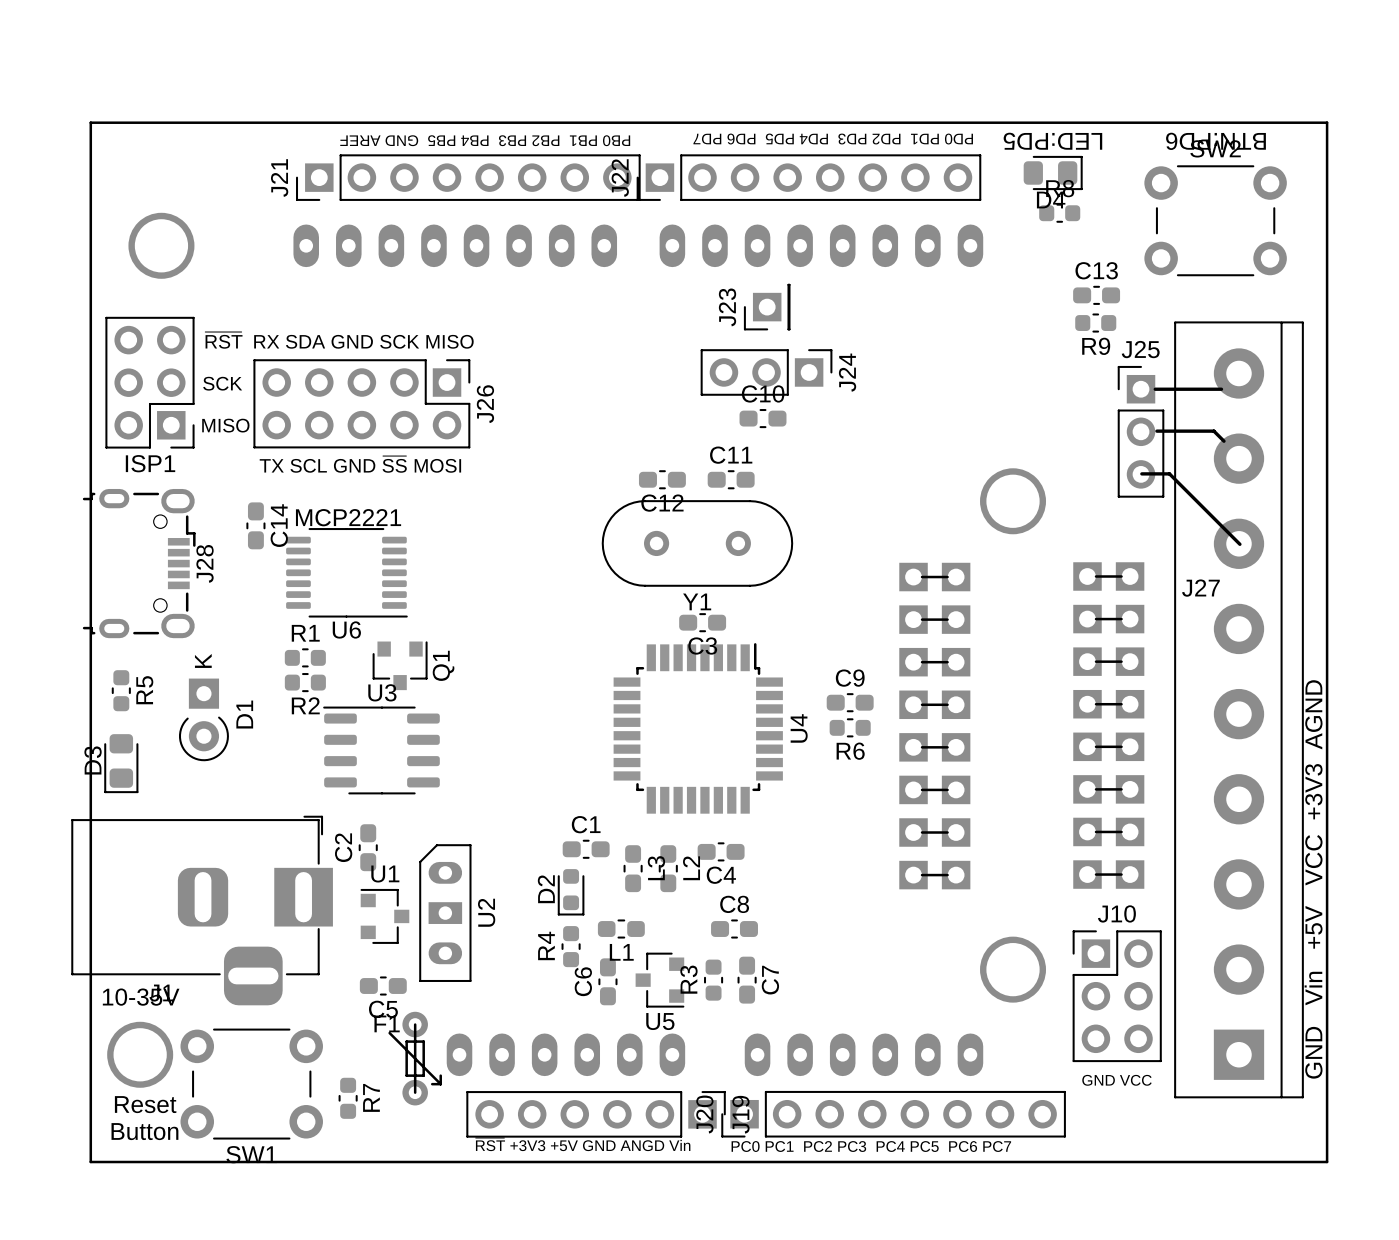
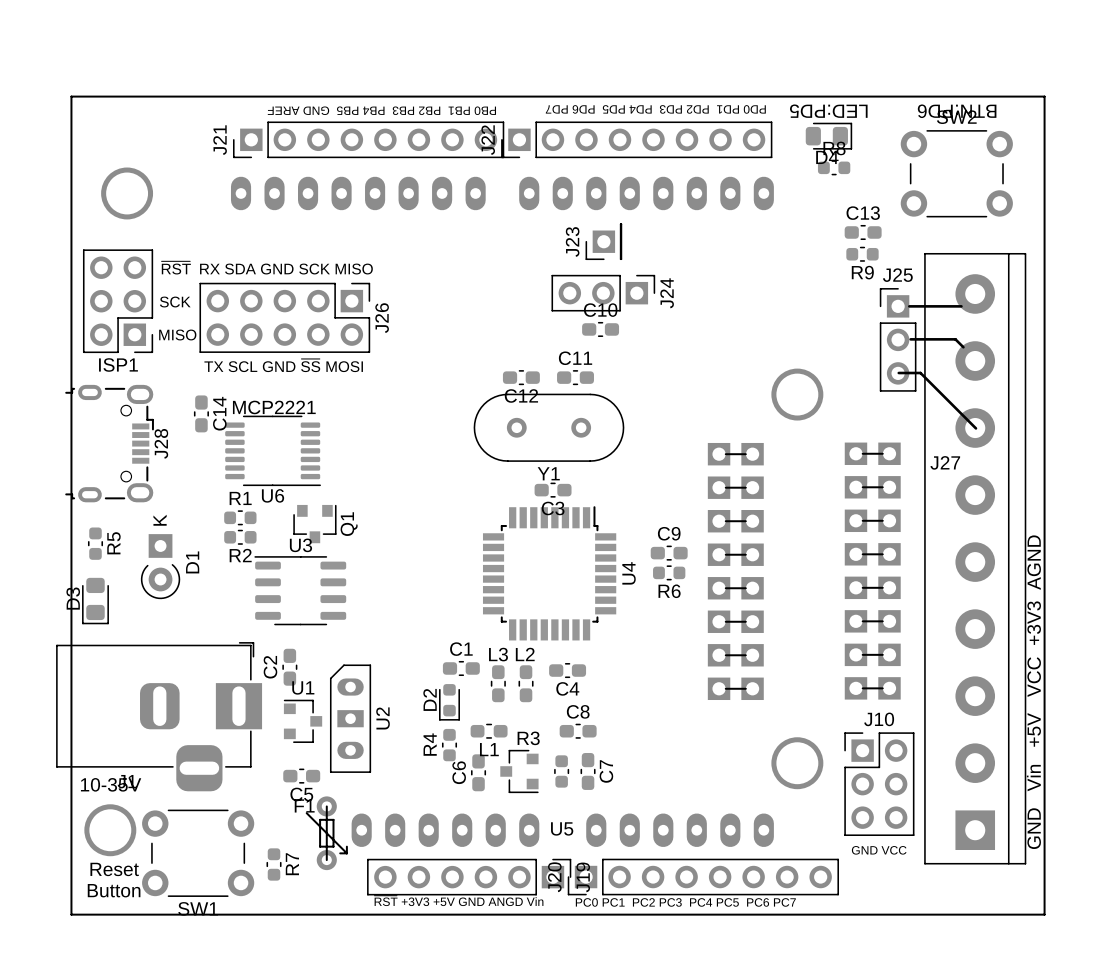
L3 name rotation: 0° (656, 868) -> 90° clockwise (498, 654)
L3 name position: L3 (656, 868) -> L3 (498, 654)
L2 name rotation: 0° (691, 868) -> 90° clockwise (525, 654)
L2 name position: L2 (691, 868) -> L2 (525, 654)
R3 name rotation: 0° (688, 979) -> 90° clockwise (528, 738)
R3 name position: R3 (688, 979) -> R3 (528, 738)
U5 name position: U5 (660, 1021) -> U5 (562, 828)

